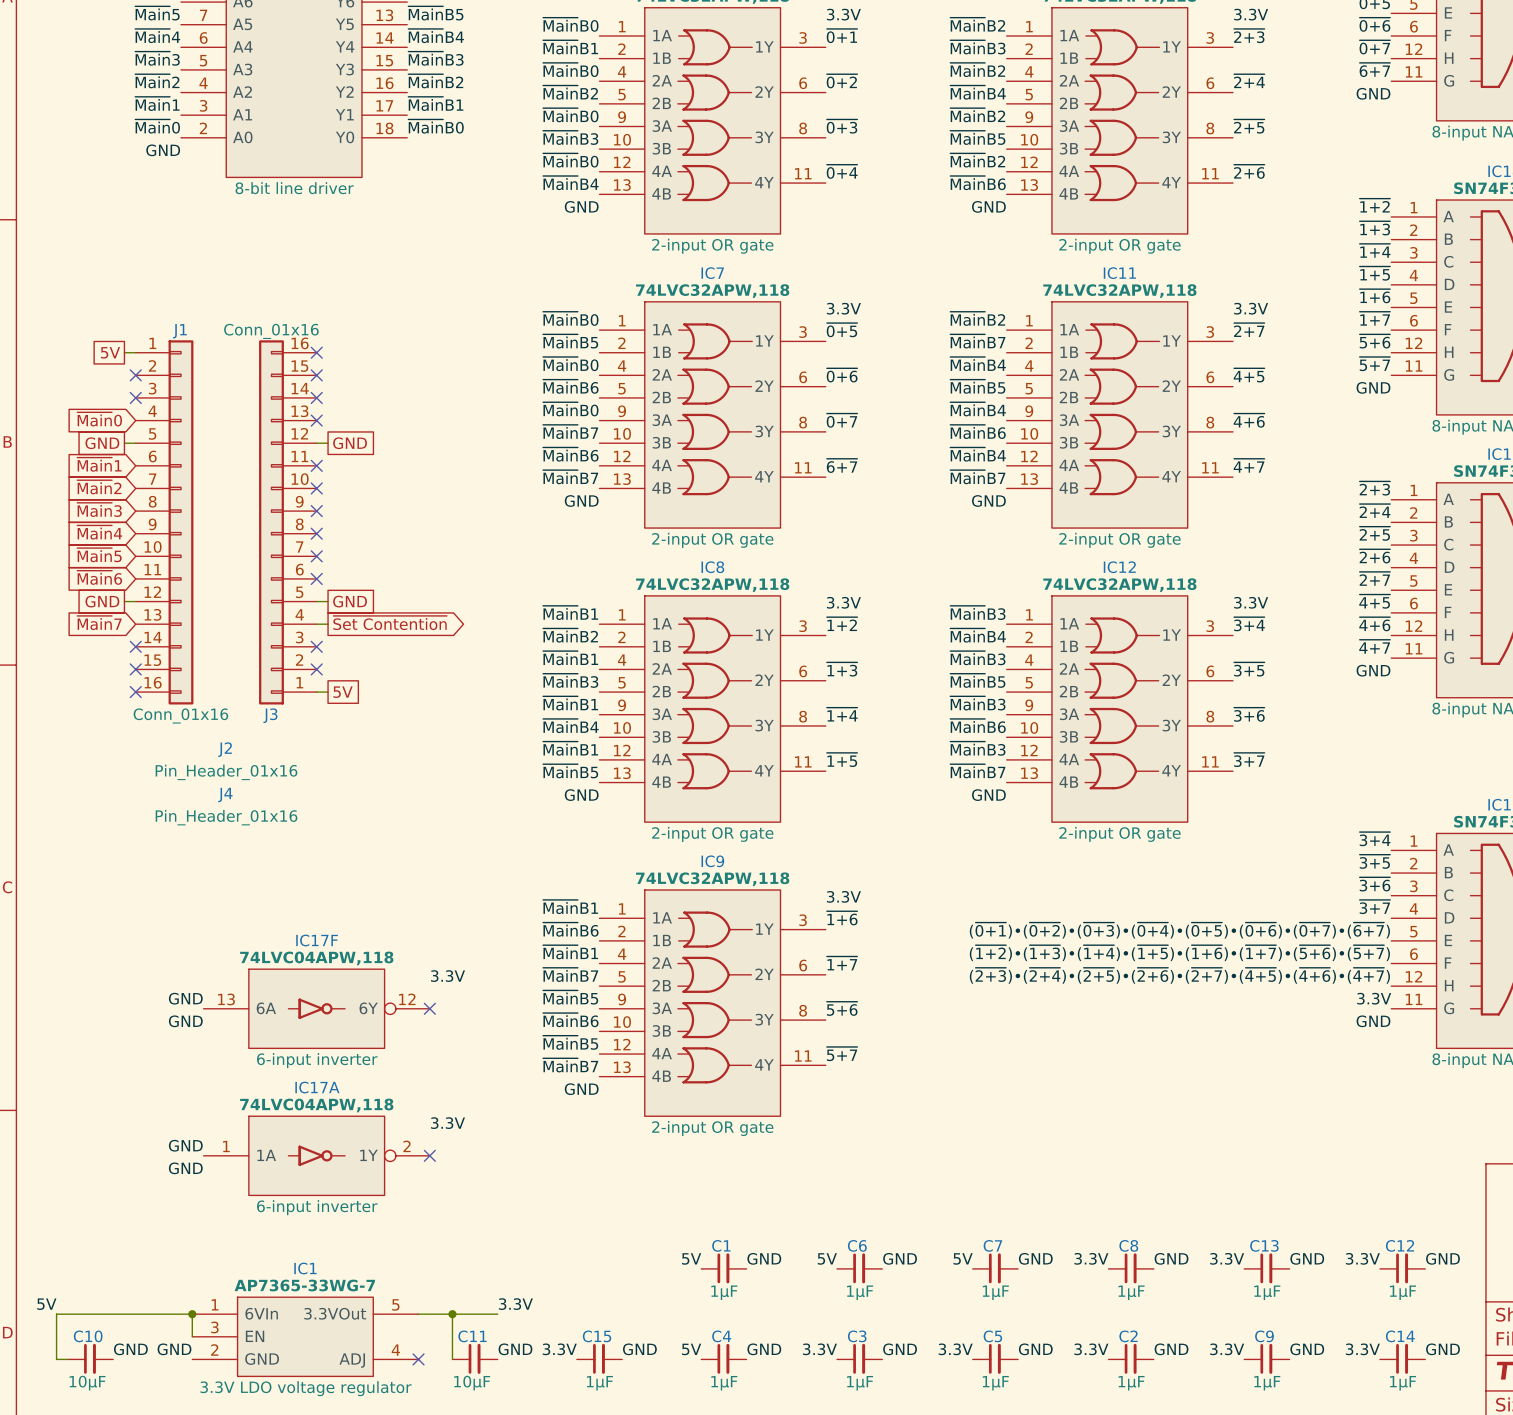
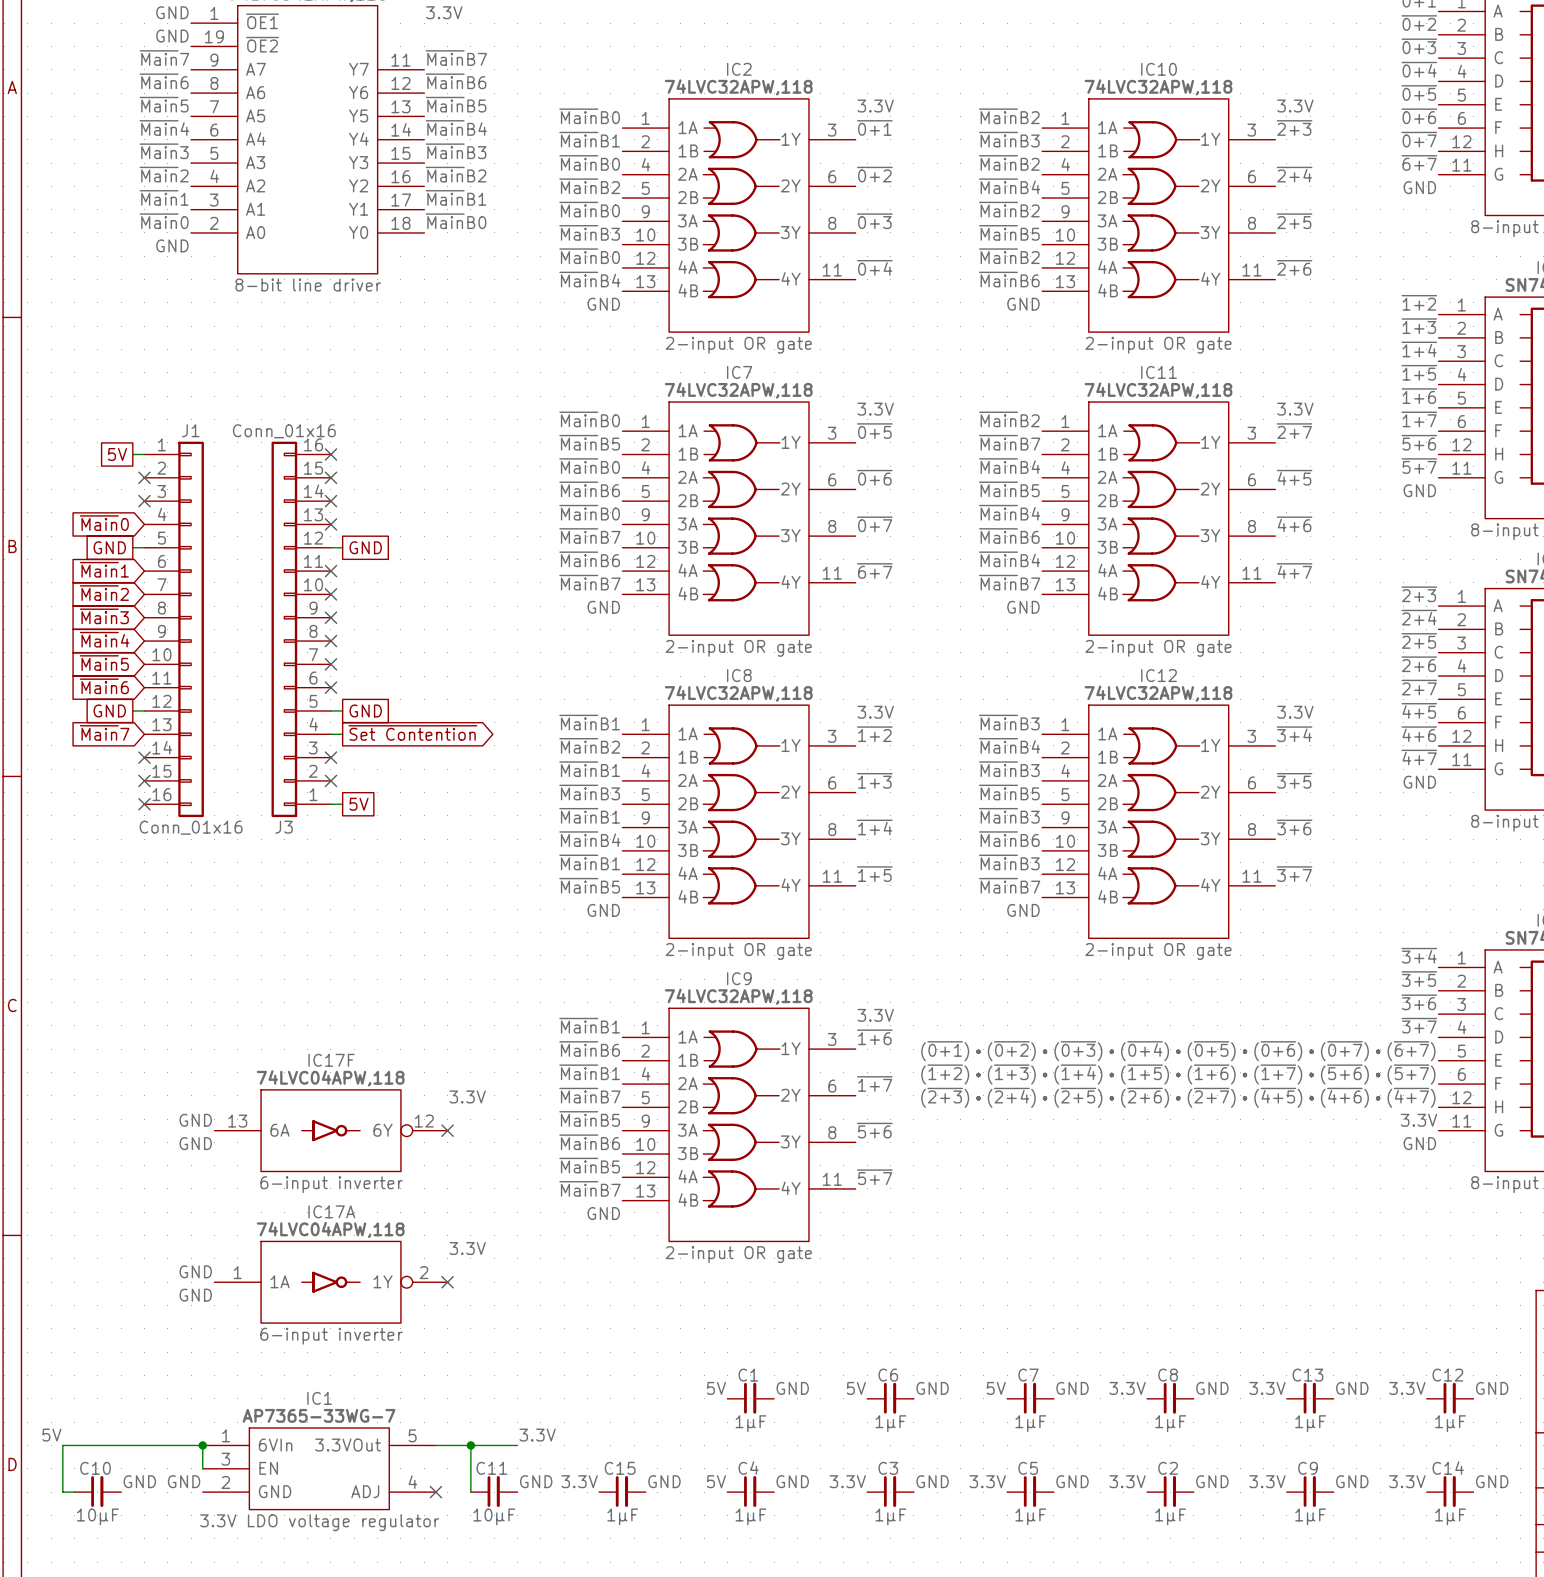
J2: Pin_Header_01x16 (226, 761) -> none
J4: Pin_Header_01x16 (226, 806) -> none

